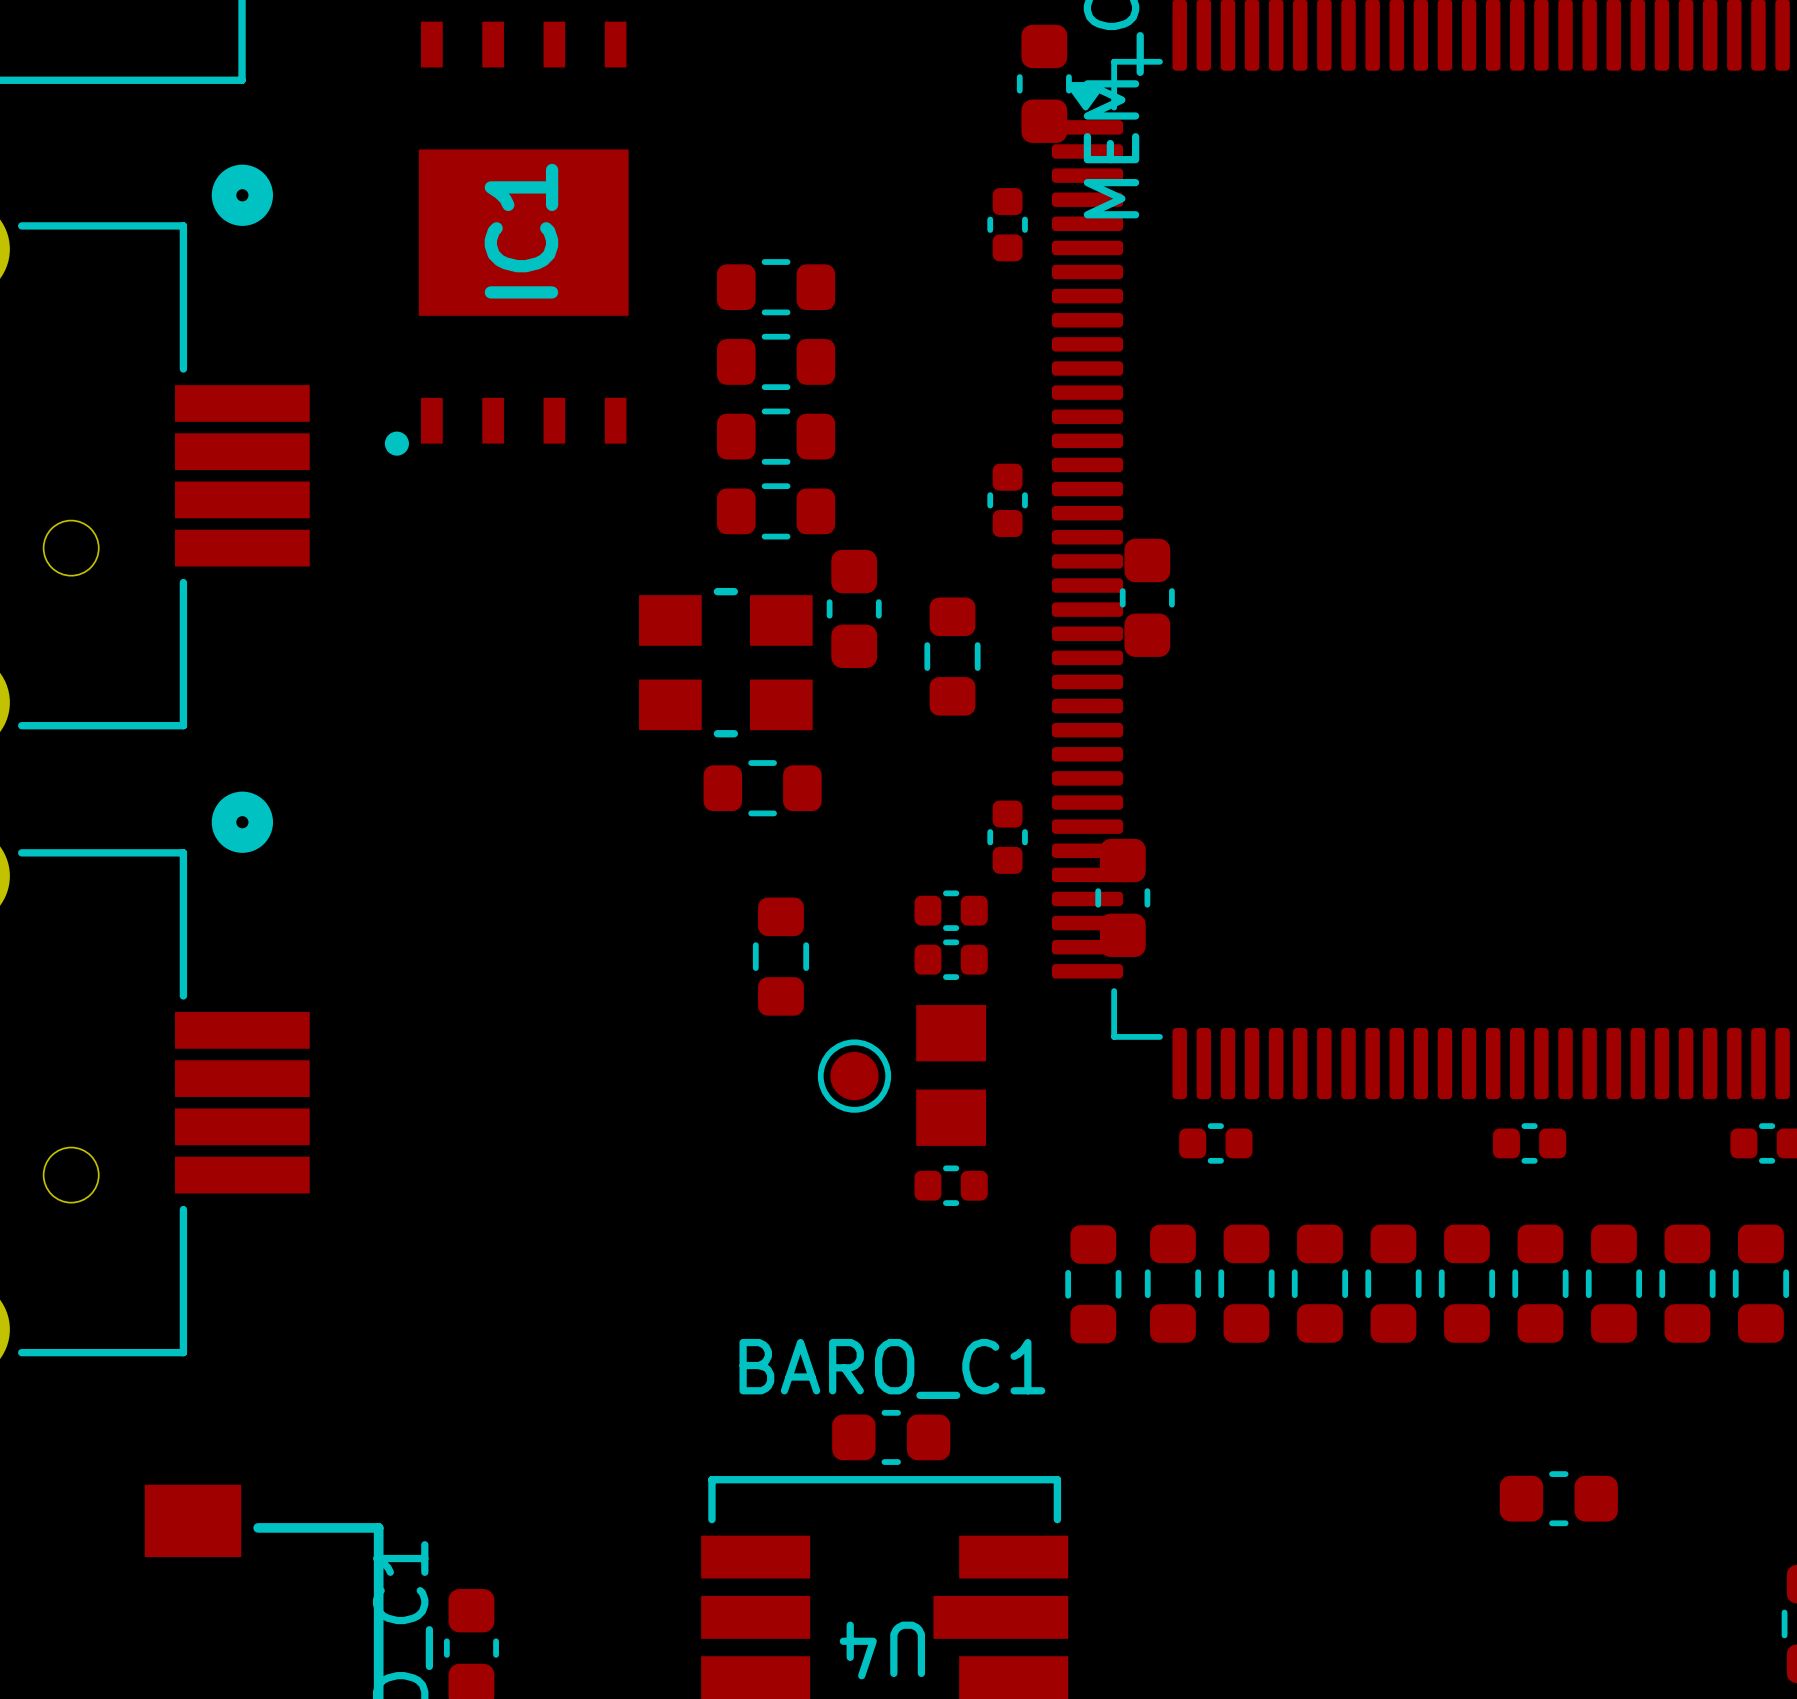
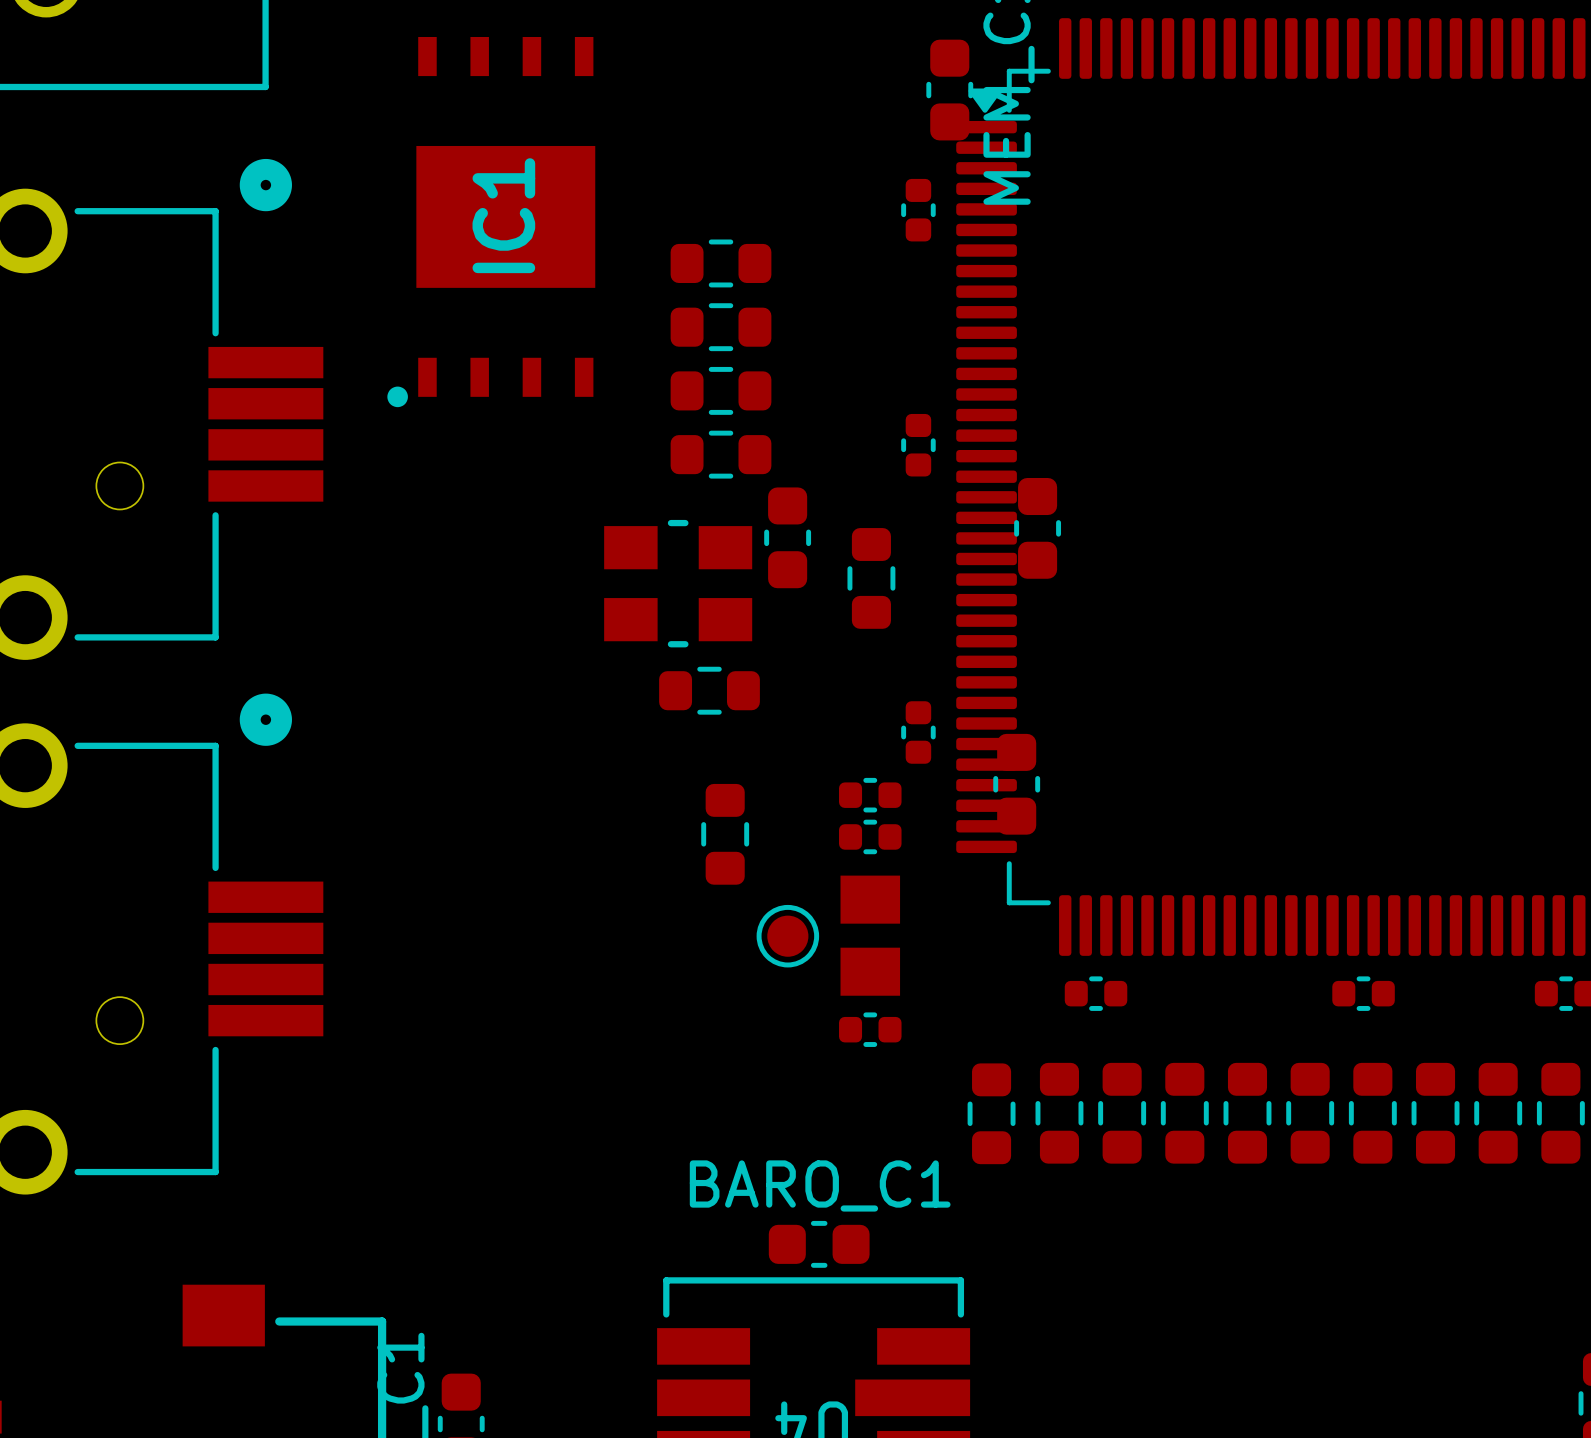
part: (1558, 1498) -> none

